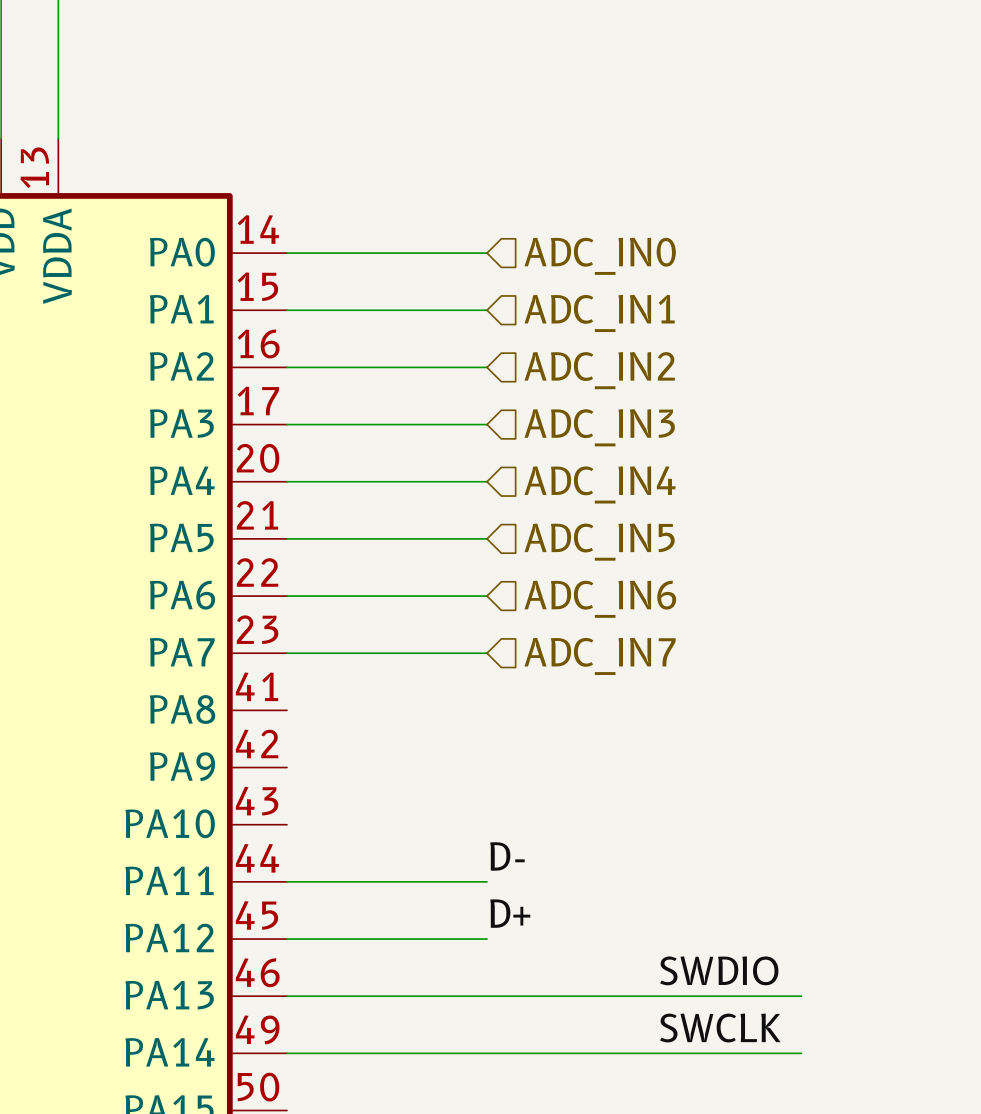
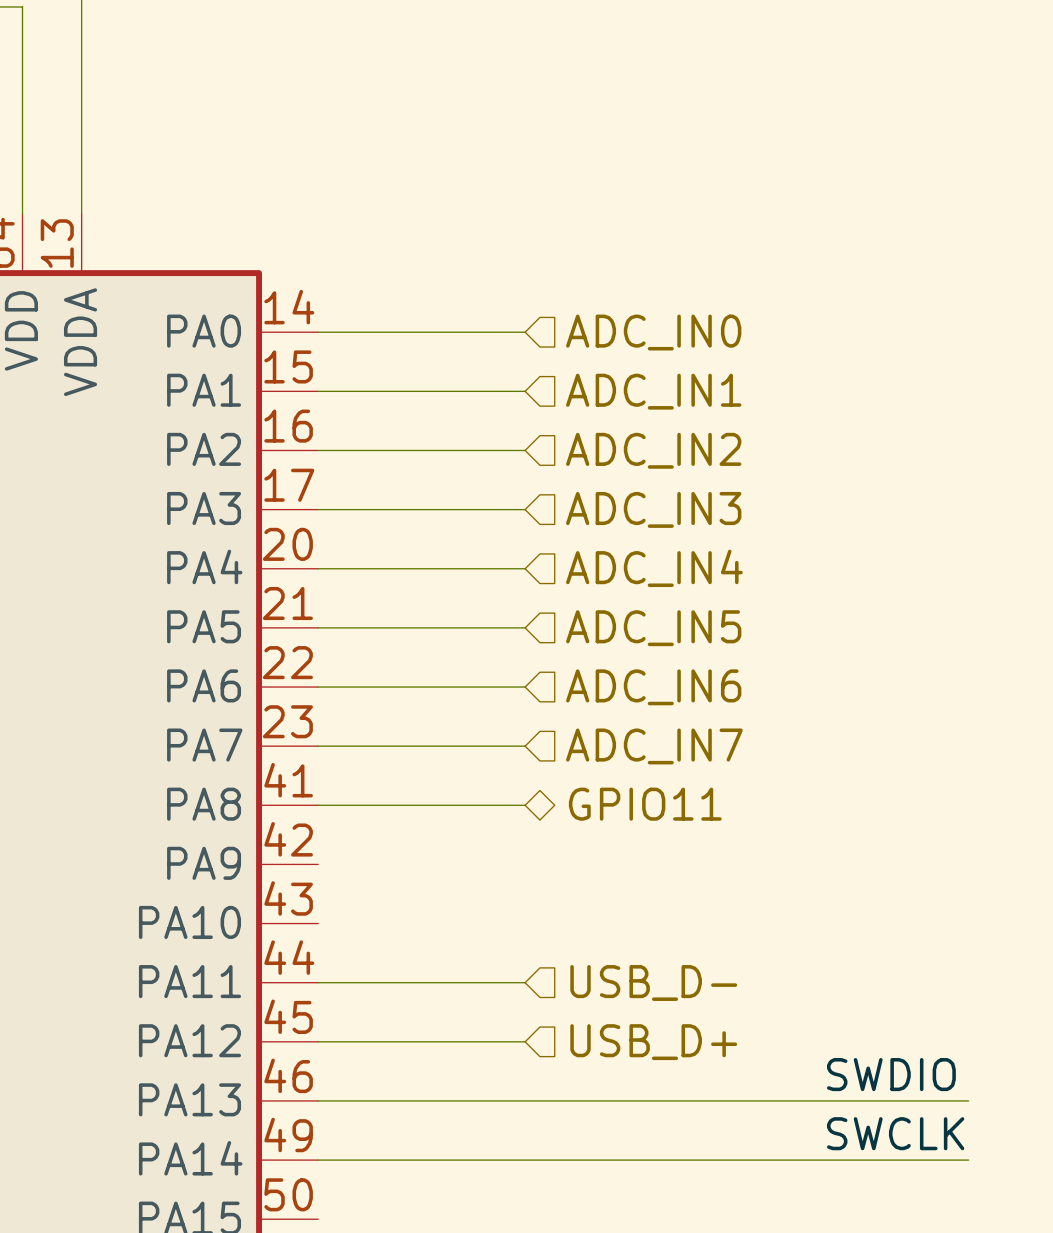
hierarchical label: none -> GPIO11 (645, 804)
wire: none -> (318, 805) (525, 805)
label: D- (507, 856) -> none
hierarchical label: none -> USB_D- (653, 982)
label: D+ (510, 913) -> none
hierarchical label: none -> USB_D+ (653, 1042)
label position: SWDIO (719, 970) -> SWDIO (891, 1074)
wire: none -> (850, 1100) (968, 1100)
label position: SWCLK (720, 1028) -> SWCLK (895, 1133)
wire: none -> (850, 1160) (968, 1160)

